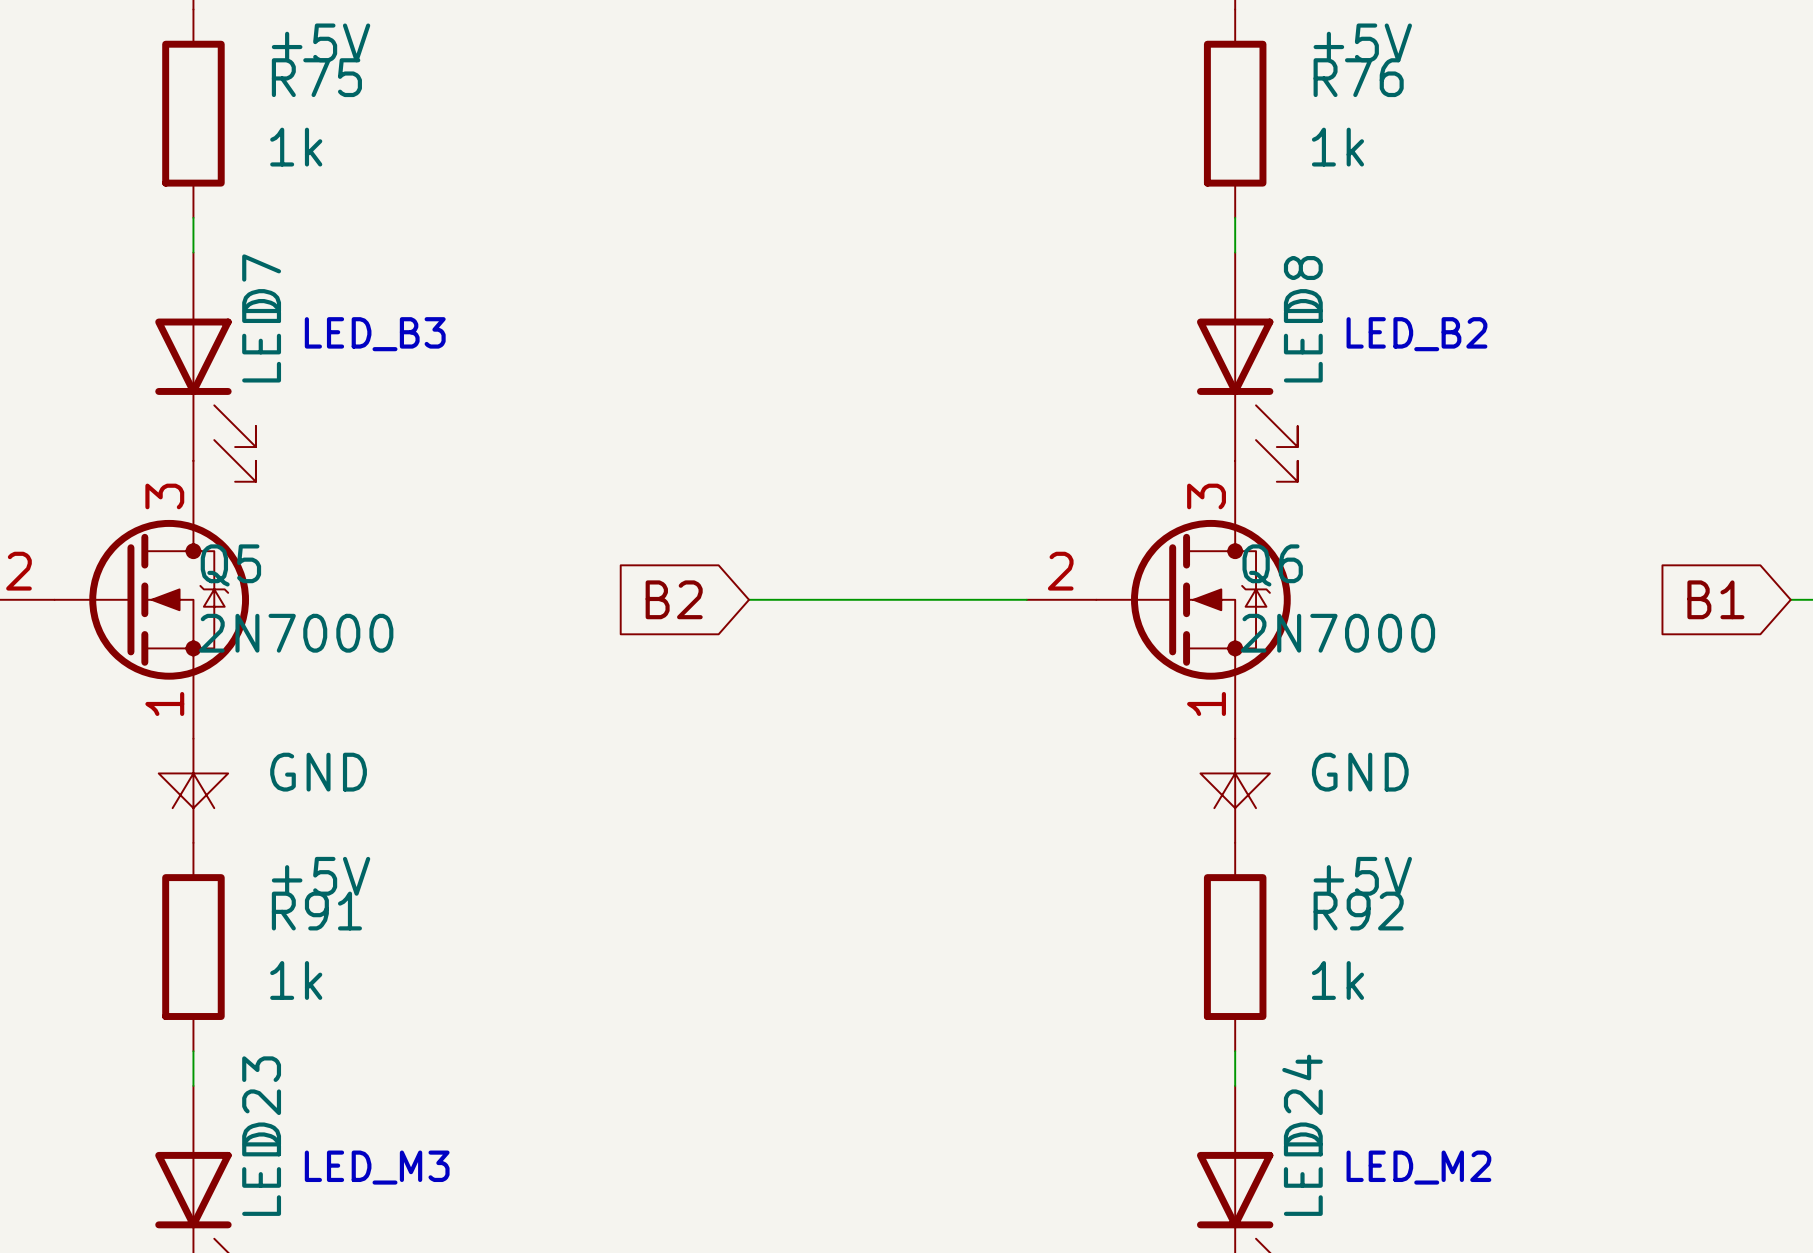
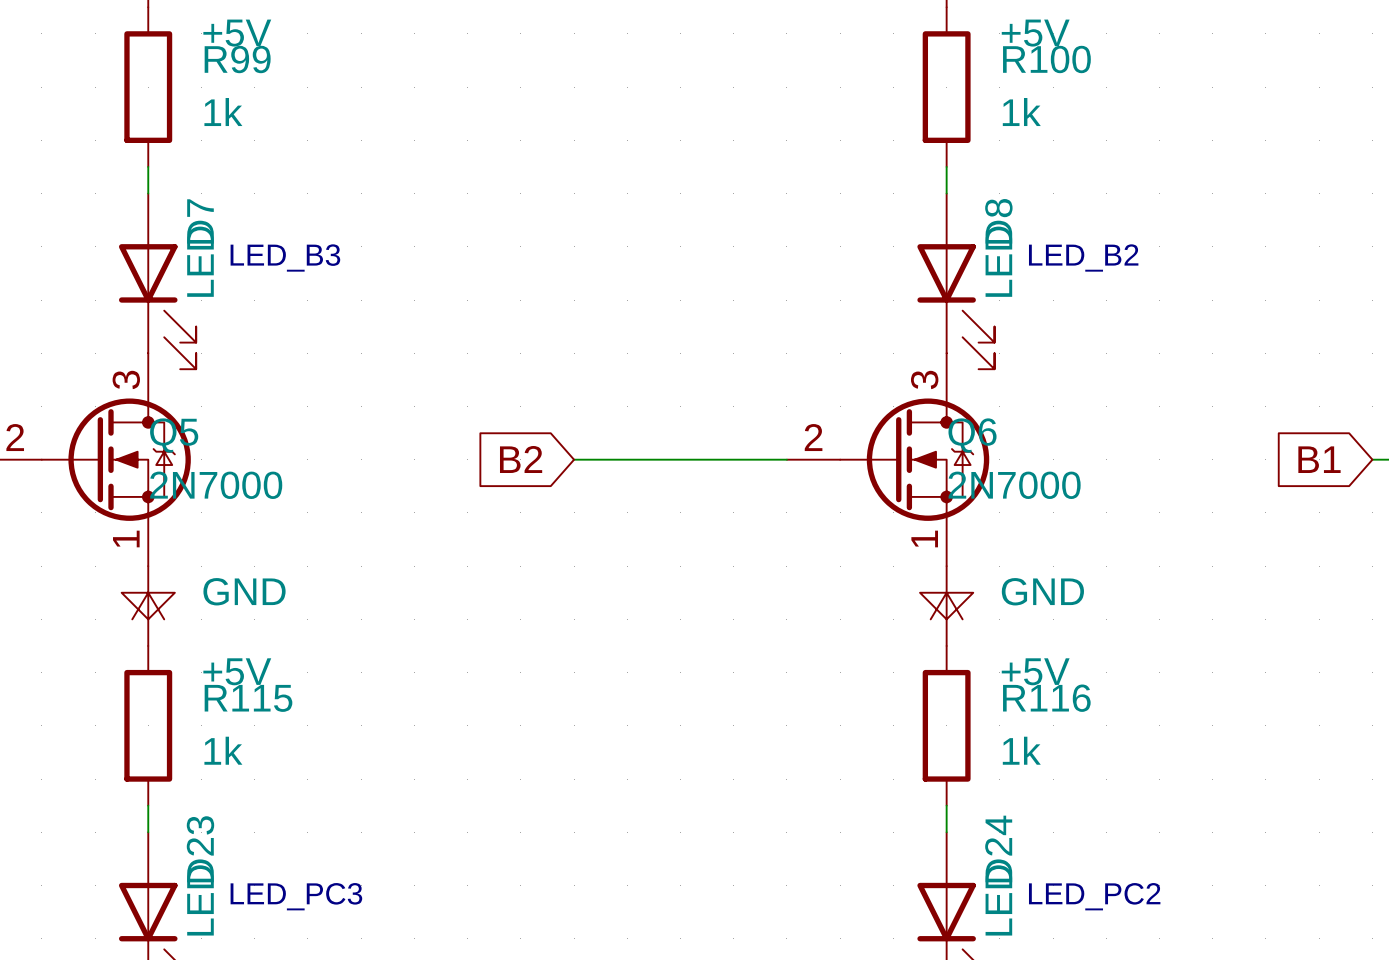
R75 name: R75 (316, 77) -> R99 (237, 59)
R76 name: R76 (1358, 77) -> R100 (1046, 59)
R91 name: R91 (316, 911) -> R115 (248, 698)
R92 name: R92 (1358, 911) -> R116 (1046, 698)
text: LED_M3 (377, 1167) -> LED_PC3 (296, 896)
text: LED_M2 (1418, 1167) -> LED_PC2 (1094, 896)

